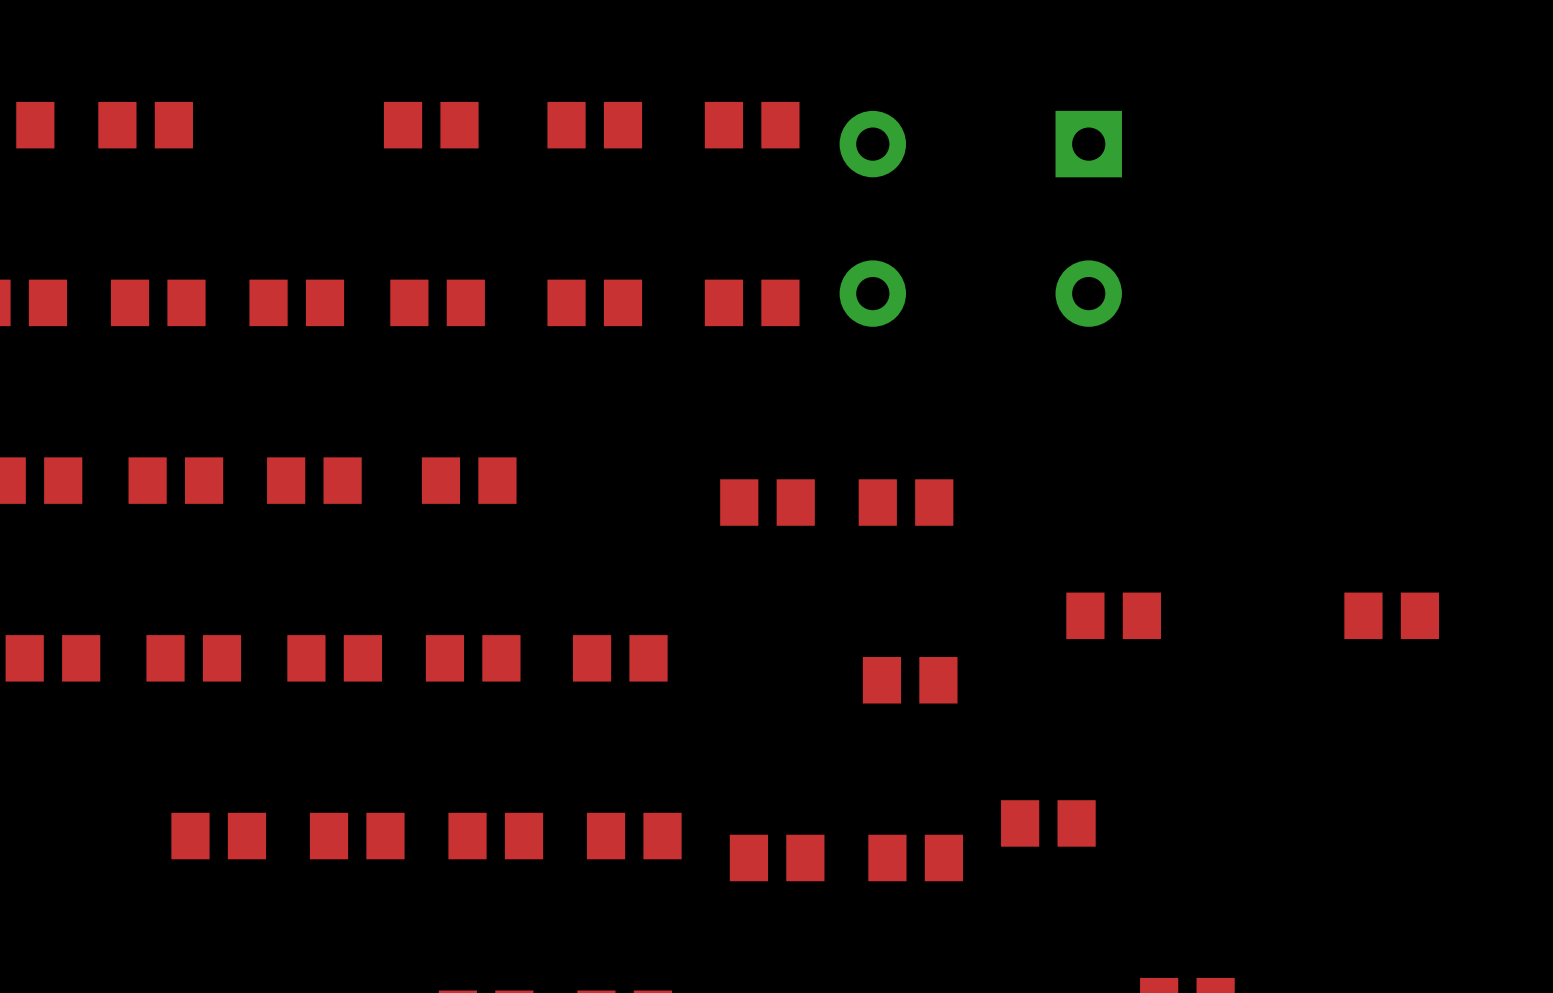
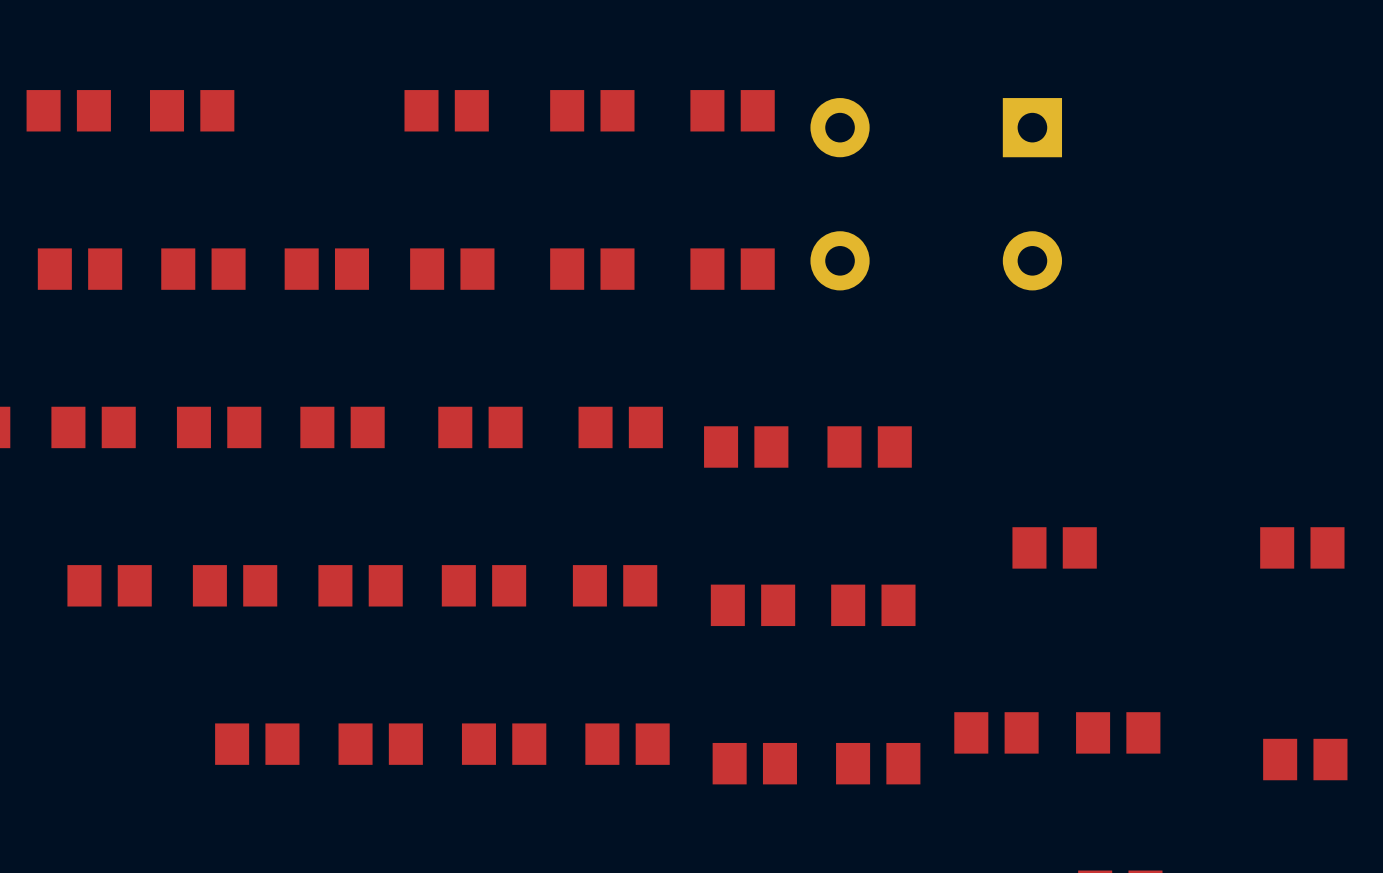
part: none -> (620, 427)
part: none -> (753, 605)
part: none -> (1118, 732)
part: none -> (1305, 759)

